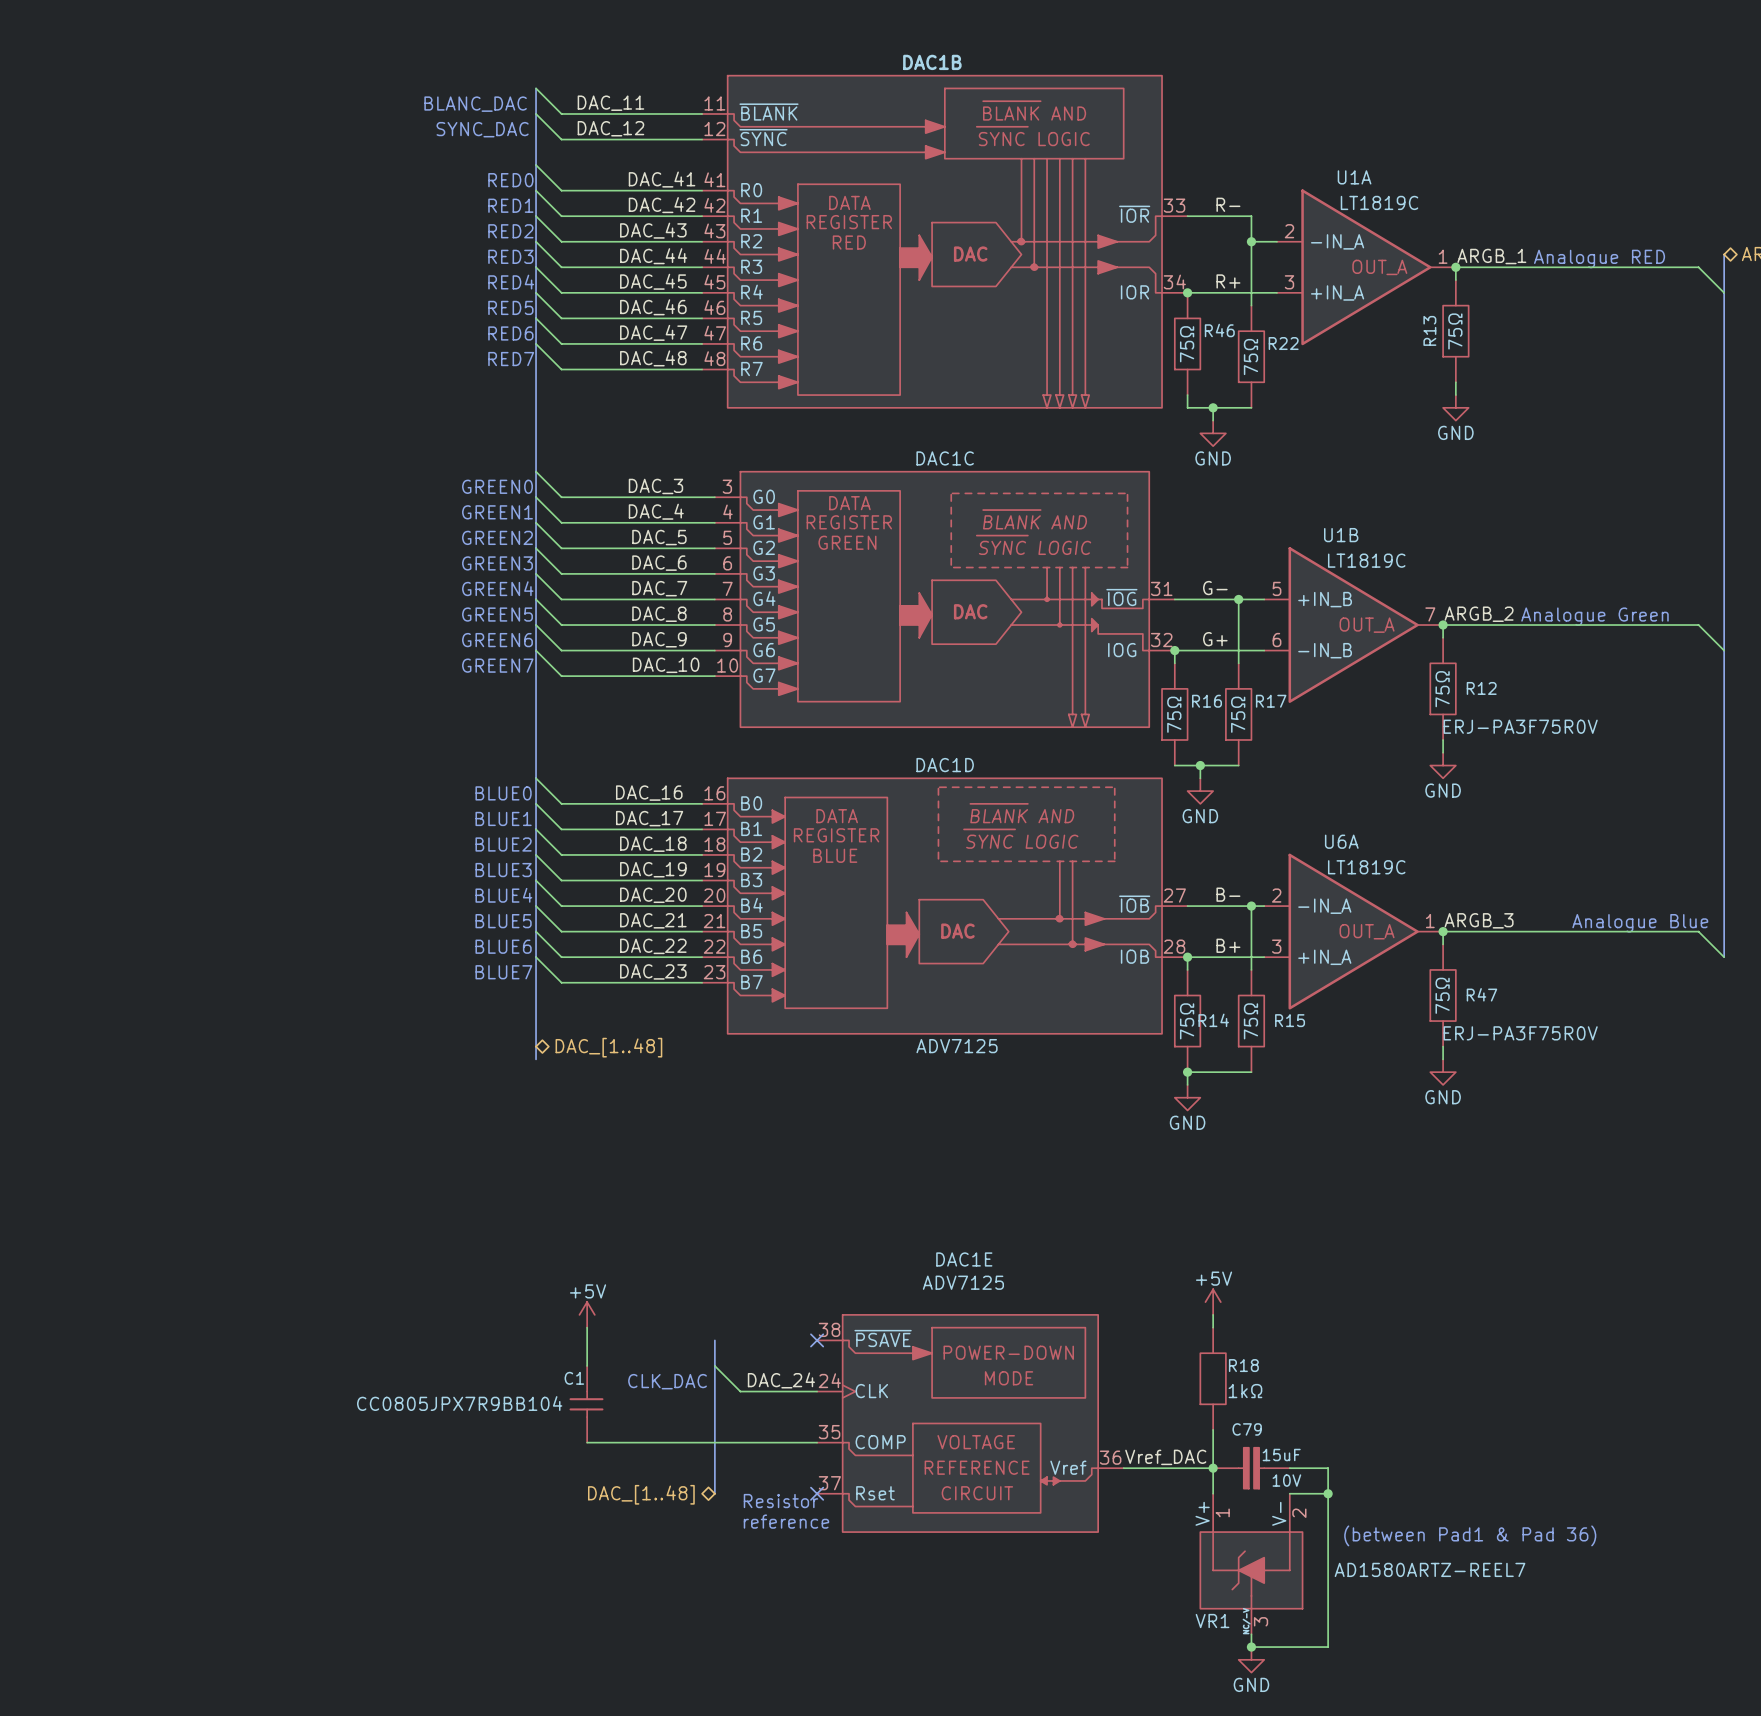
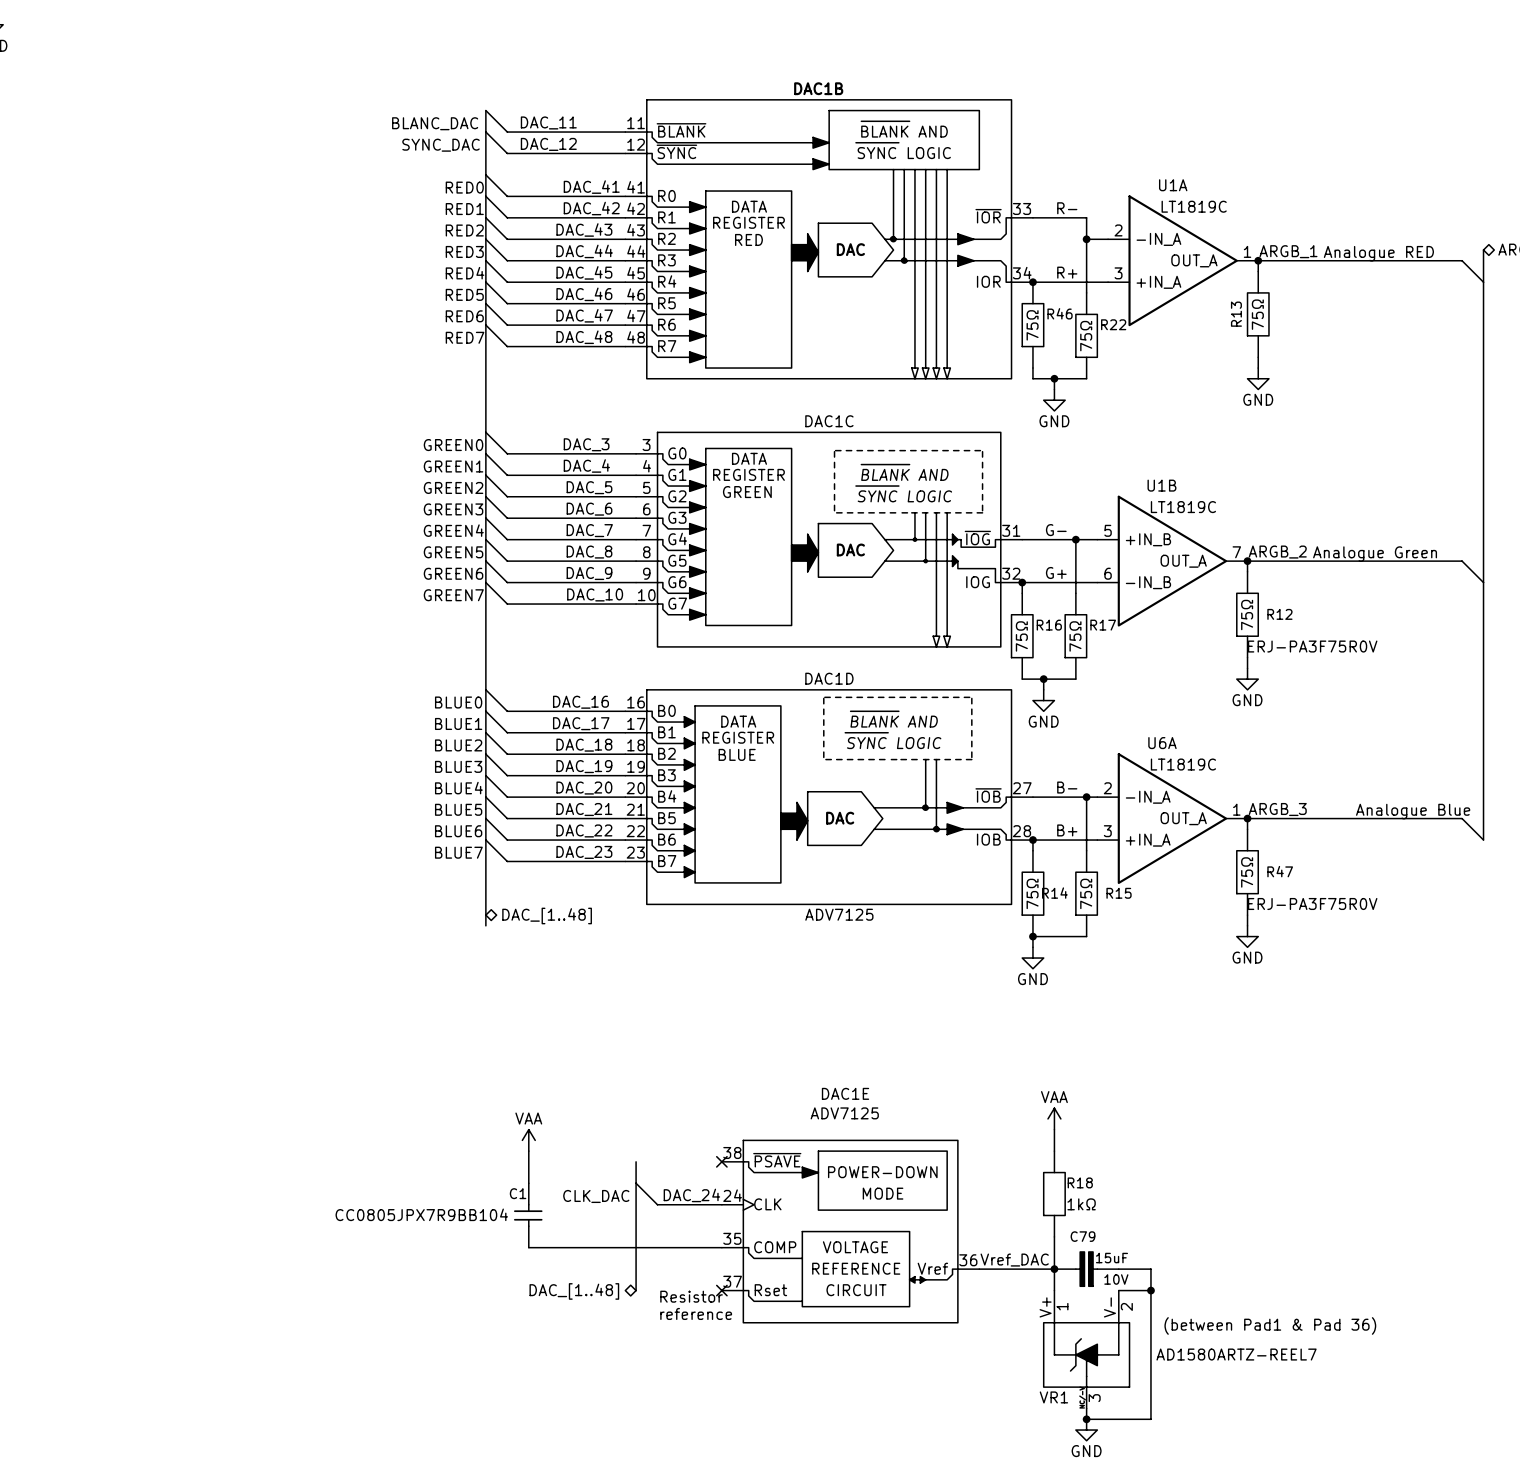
power symbol: none -> VAA (1054, 1118)
power symbol: +5V (1213, 1302) -> none
power symbol: +5V (587, 1314) -> VAA (528, 1140)

